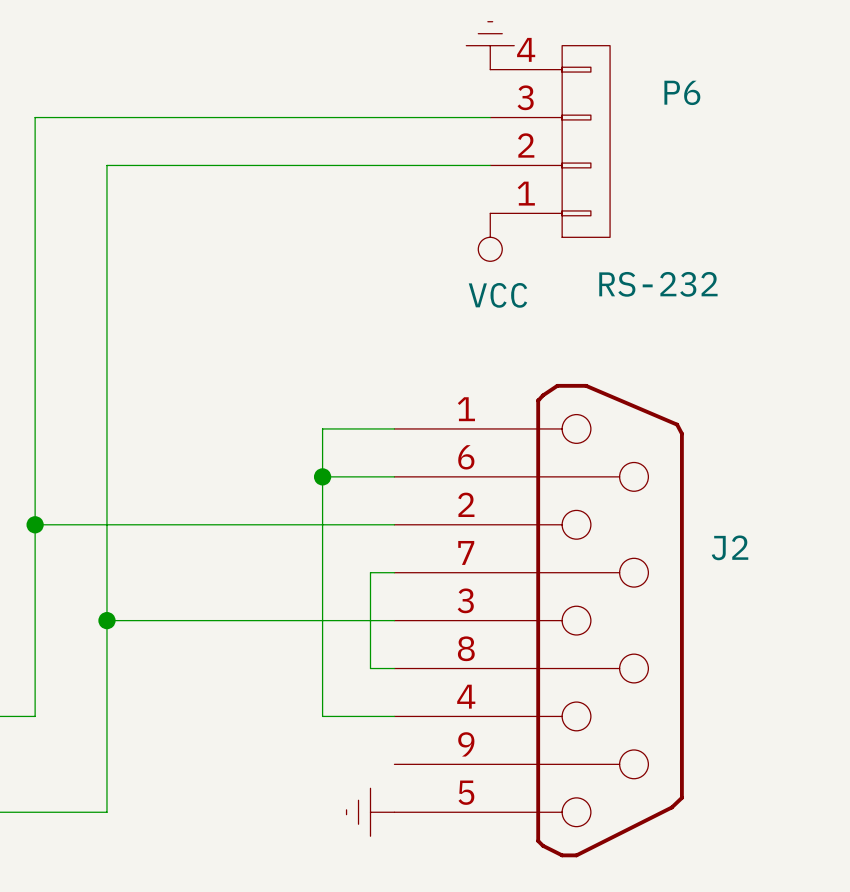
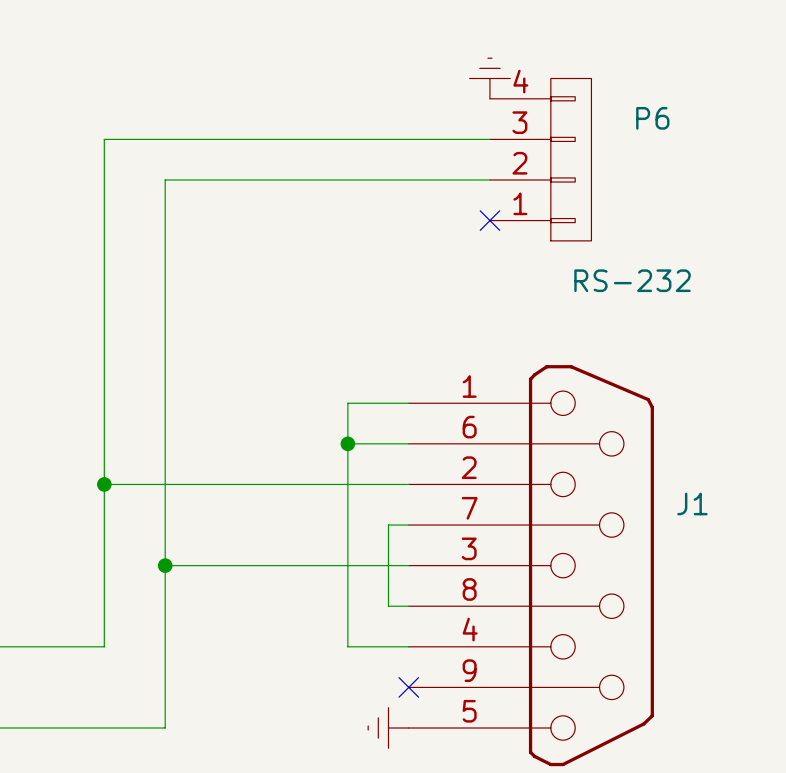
no-connect mark: none -> (489, 220)
power symbol: VCC (490, 237) -> none
J2 name: J2 (730, 547) -> J1 (692, 503)
no-connect mark: none -> (408, 687)

